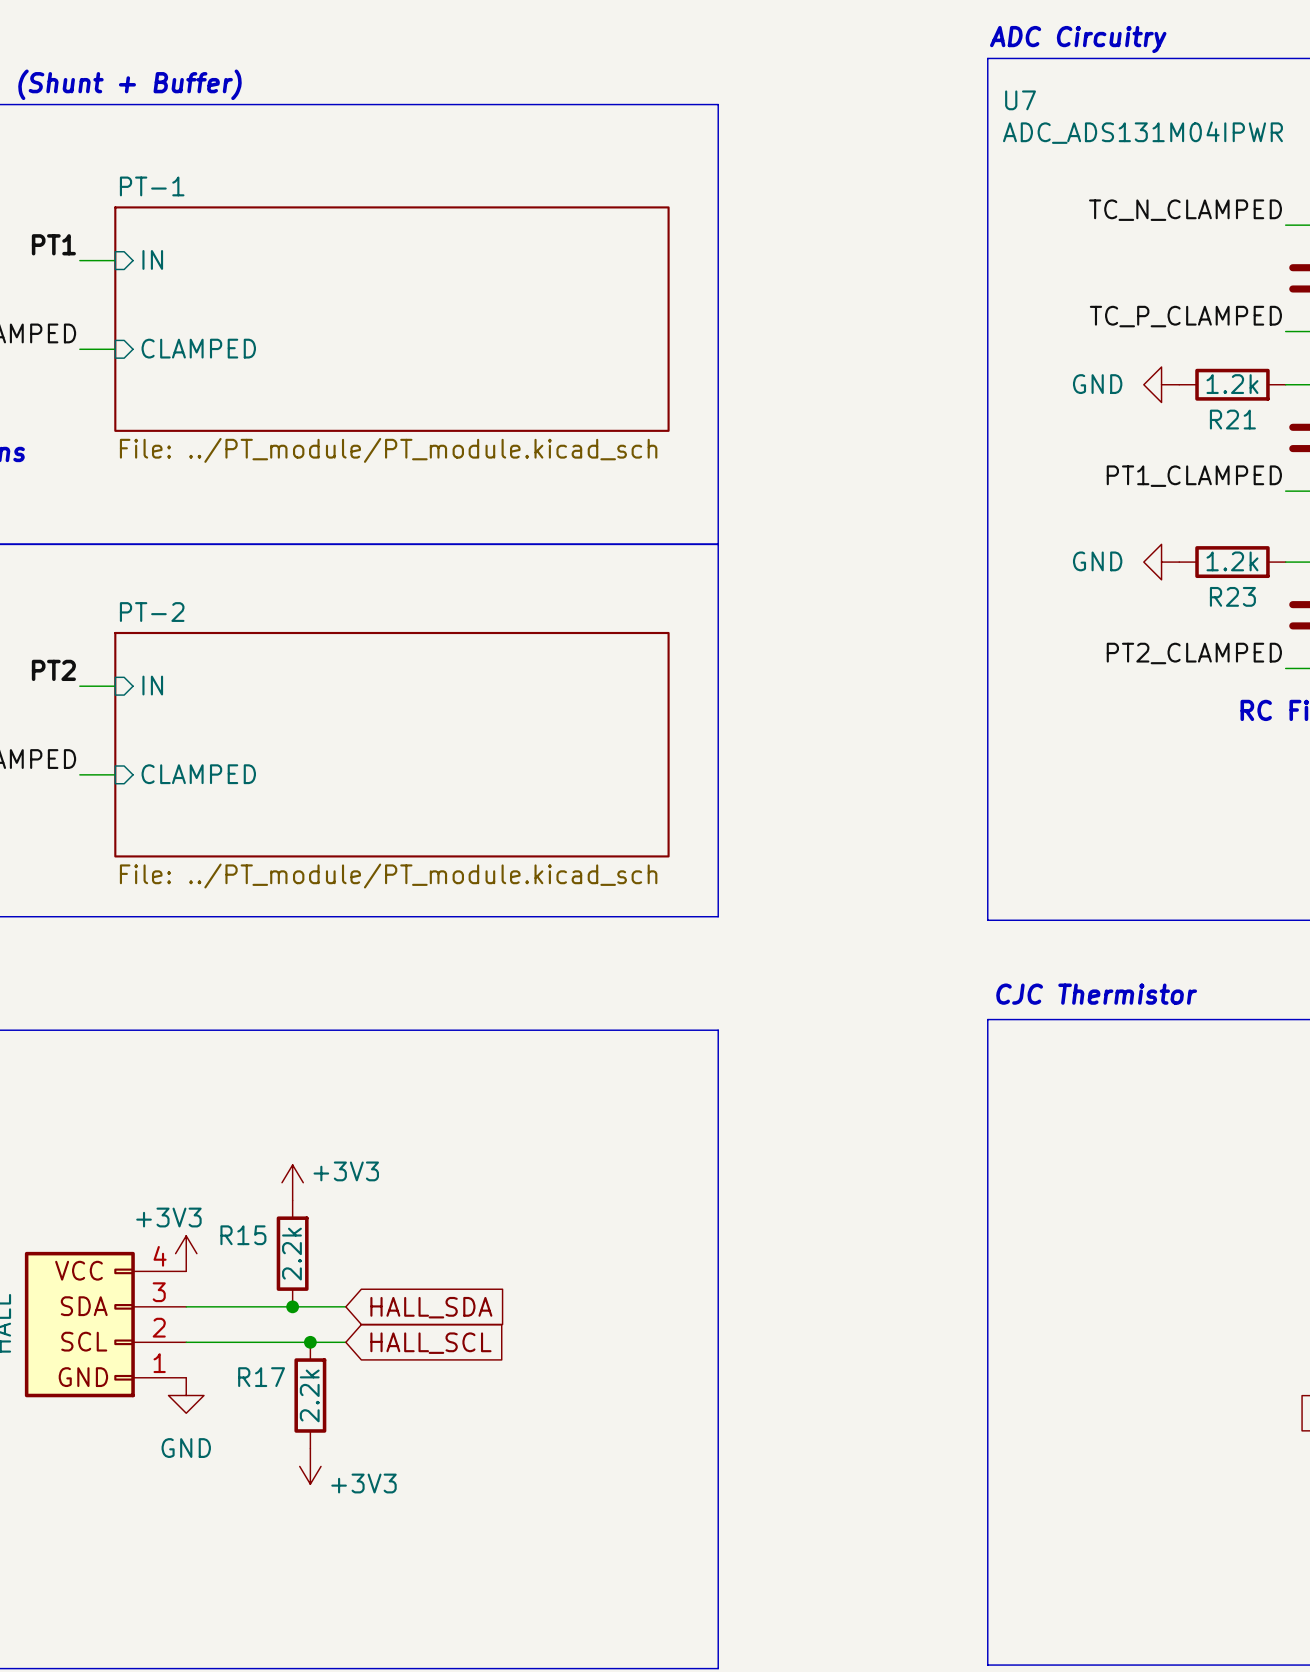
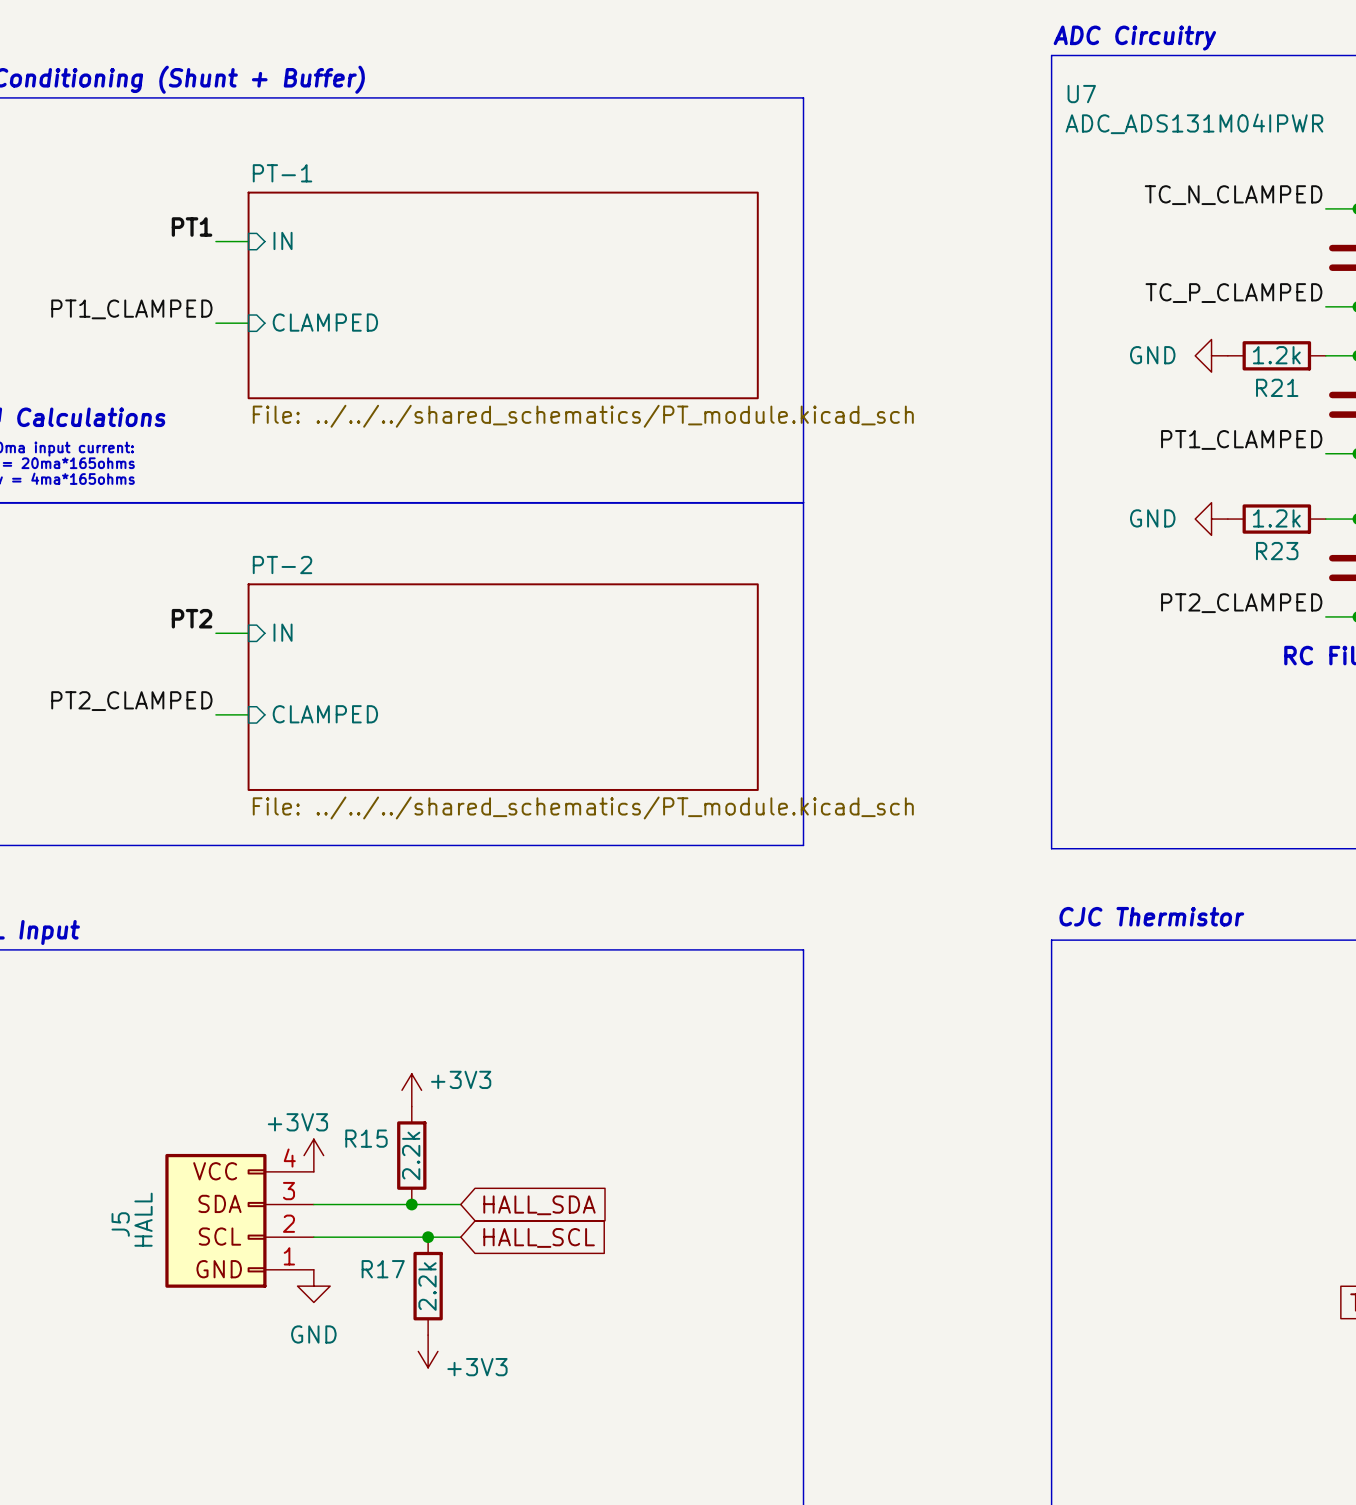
sheet PT-1 value: File: ../PT_module/PT_module.kicad_sch (388, 450) -> File: ../../../shared_schematics/PT_module.kicad_sch (583, 416)
sheet PT-2 value: File: ../PT_module/PT_module.kicad_sch (388, 875) -> File: ../../../shared_schematics/PT_module.kicad_sch (583, 807)

